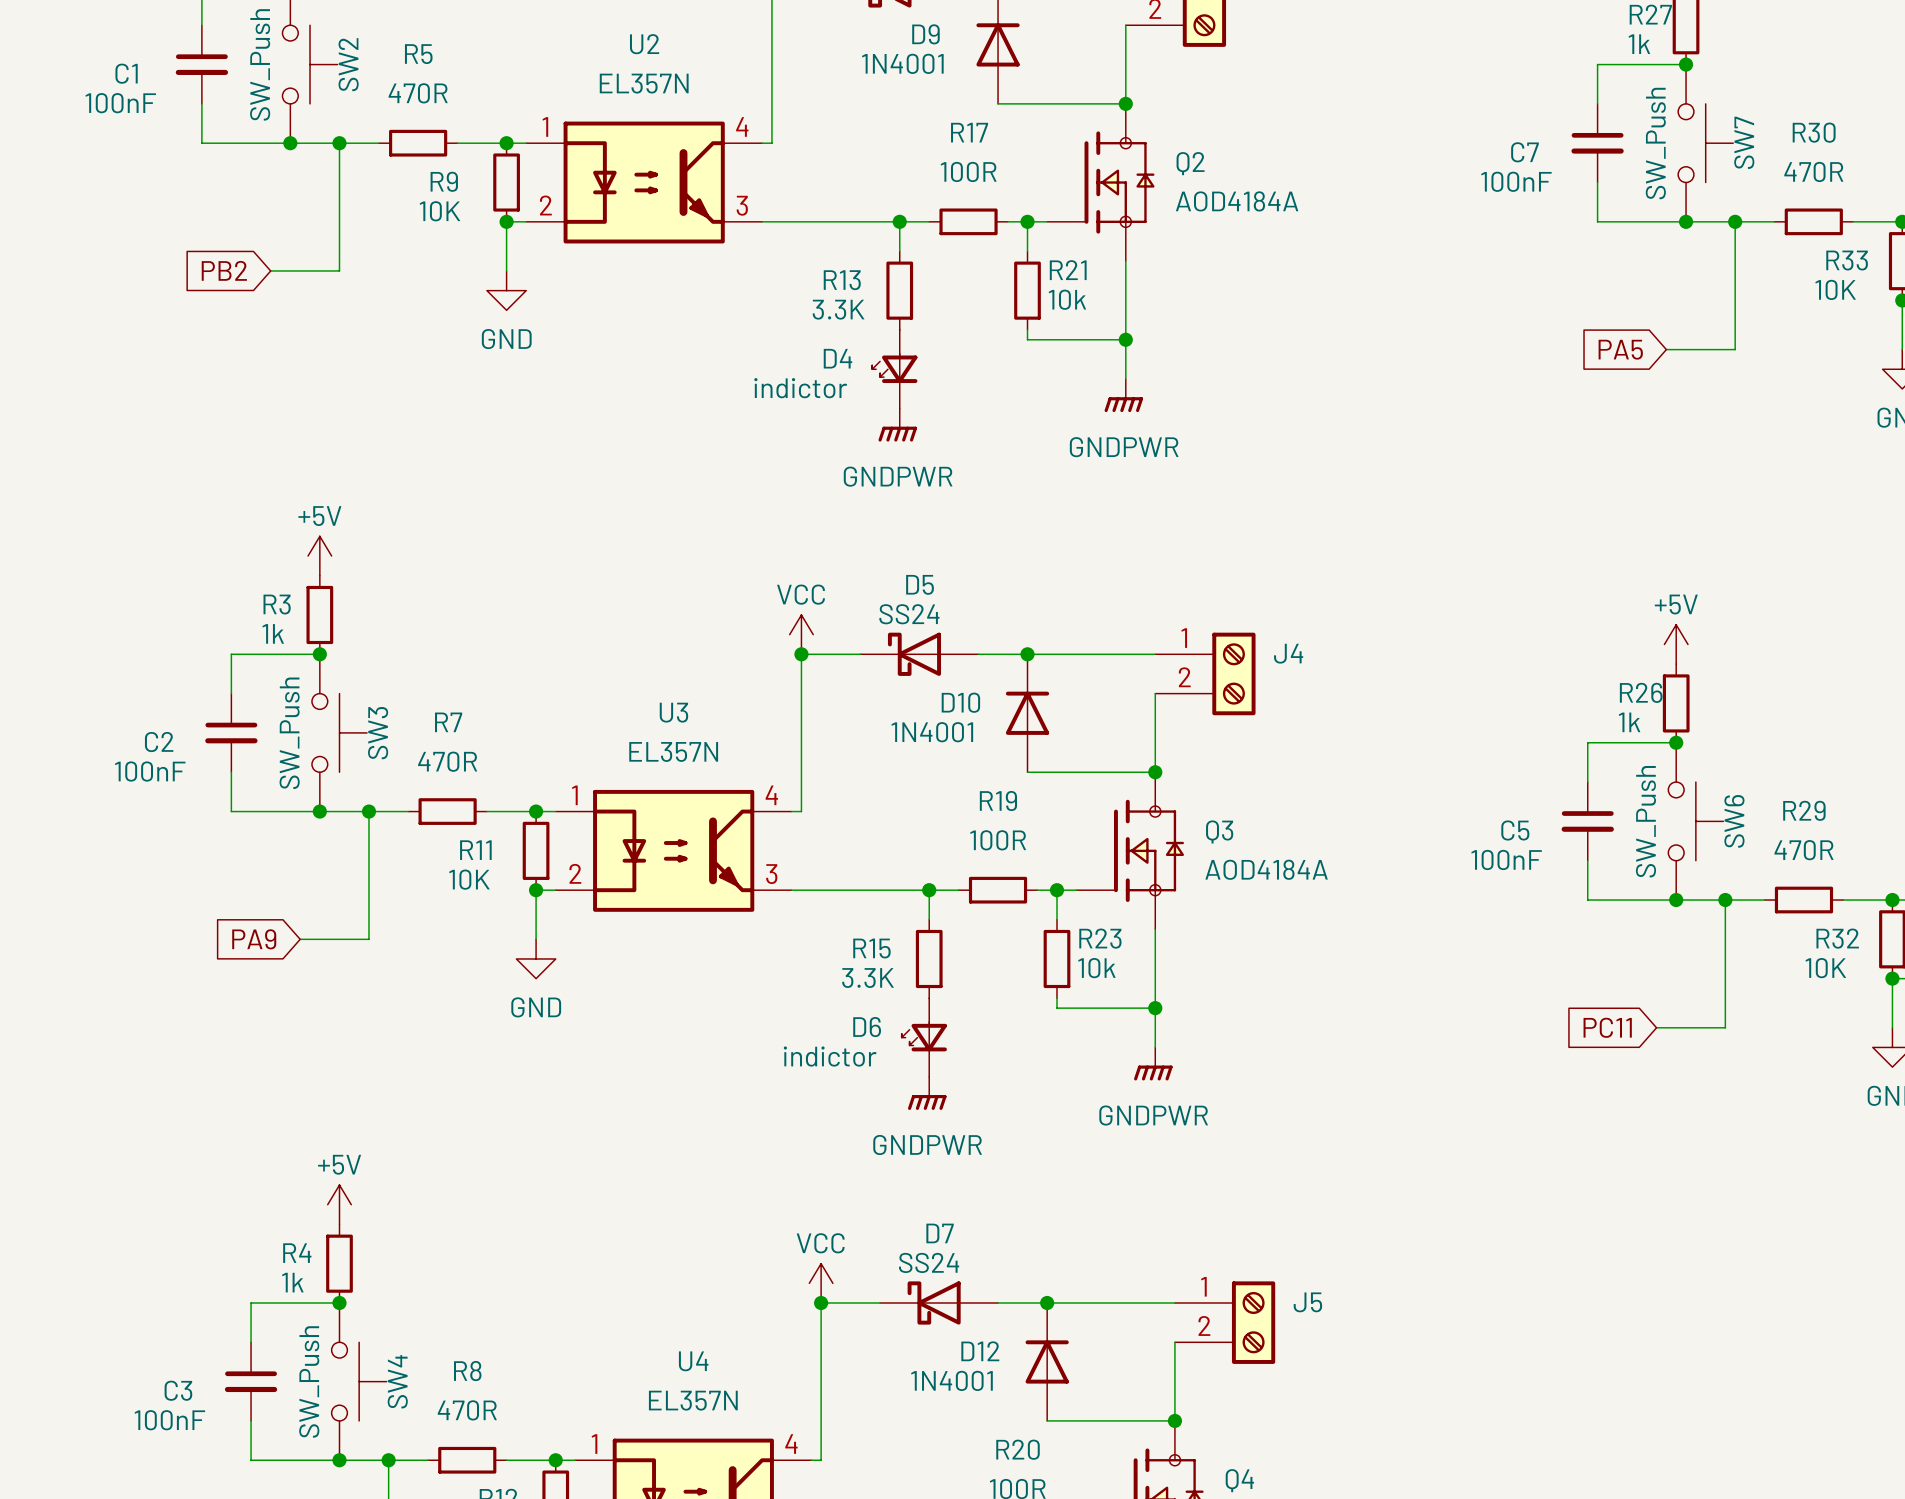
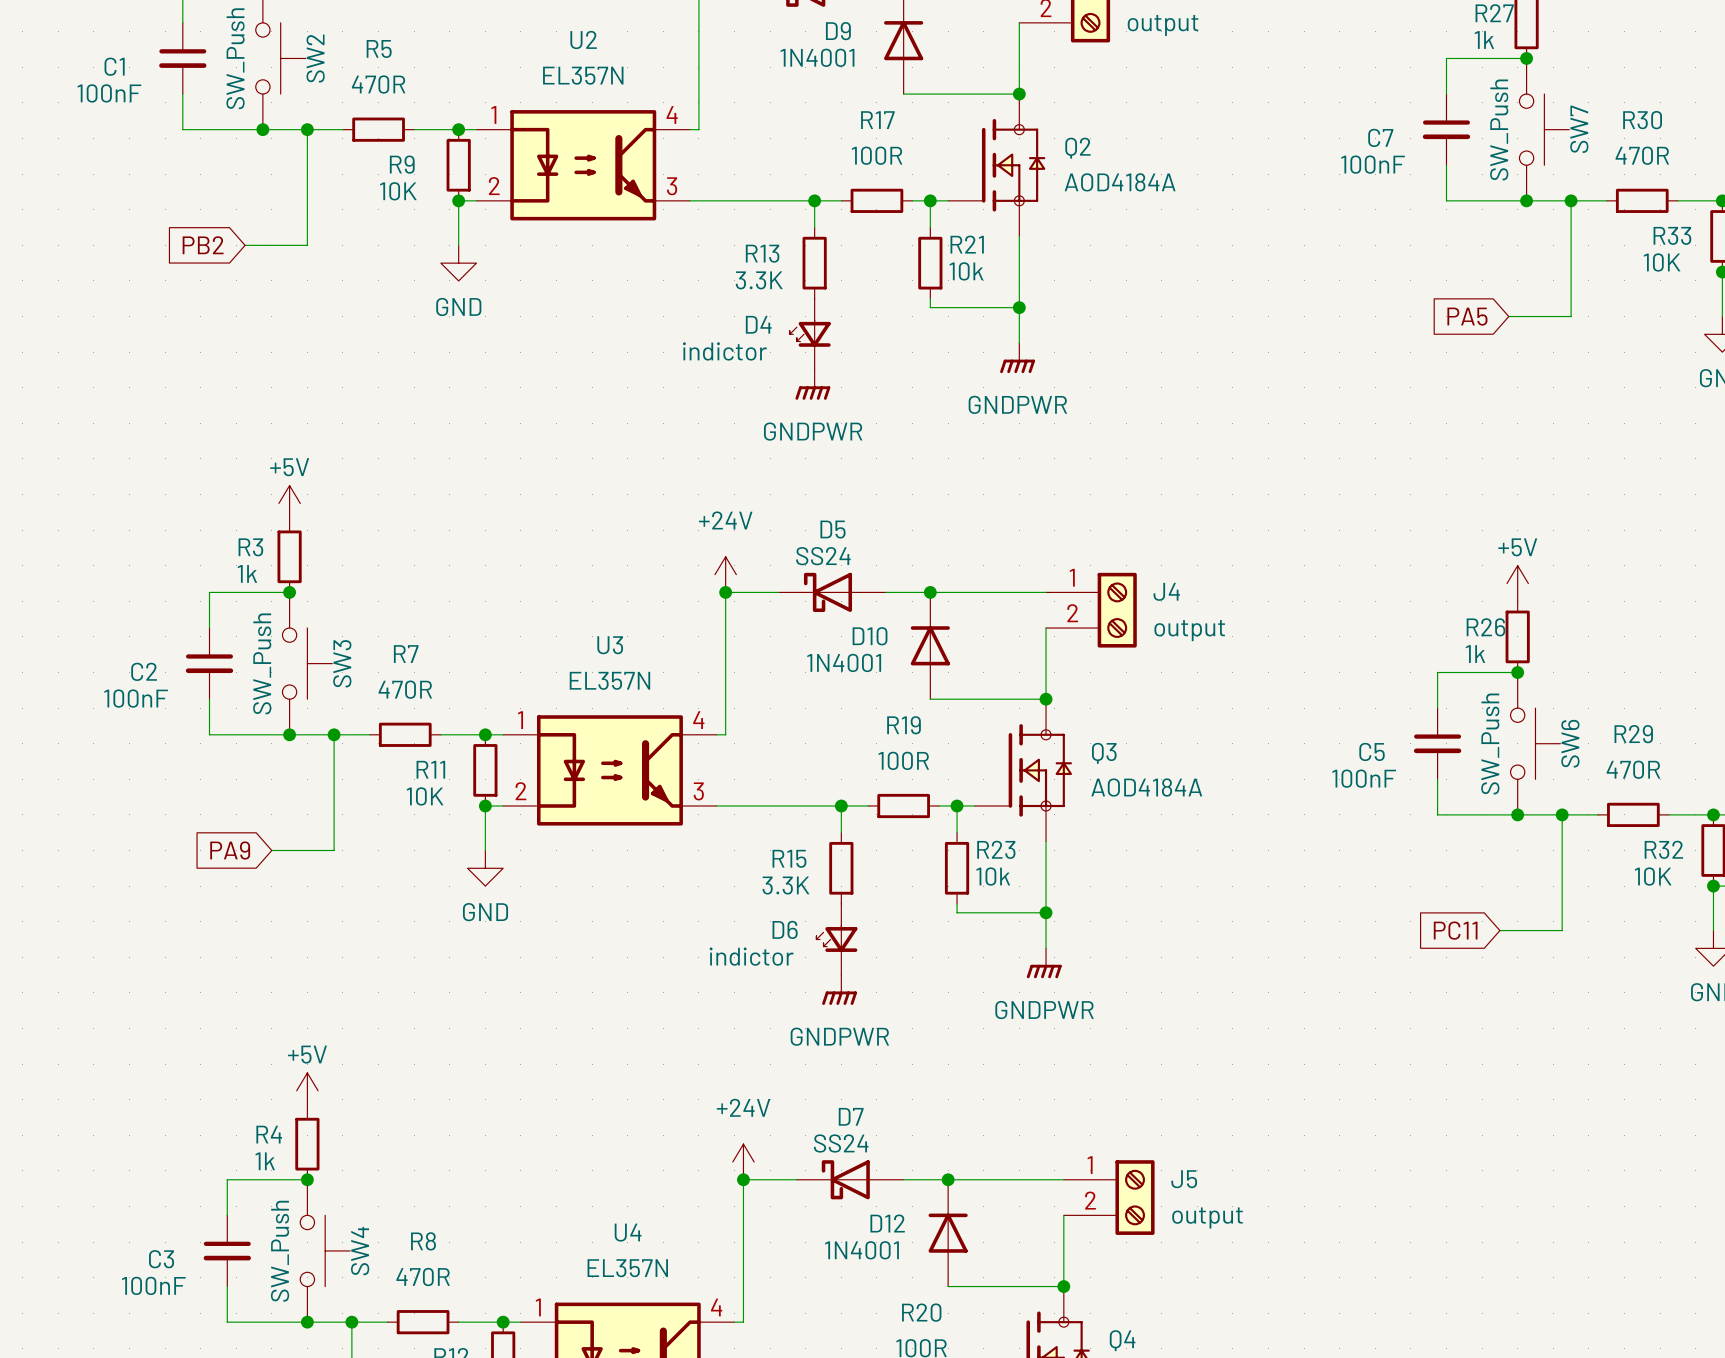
part value: none -> output (1163, 25)
power symbol: VCC (801, 634) -> +24V (725, 574)
J4 value: none -> output (1189, 630)
power symbol: VCC (821, 1283) -> +24V (743, 1161)
J5 value: none -> output (1207, 1217)

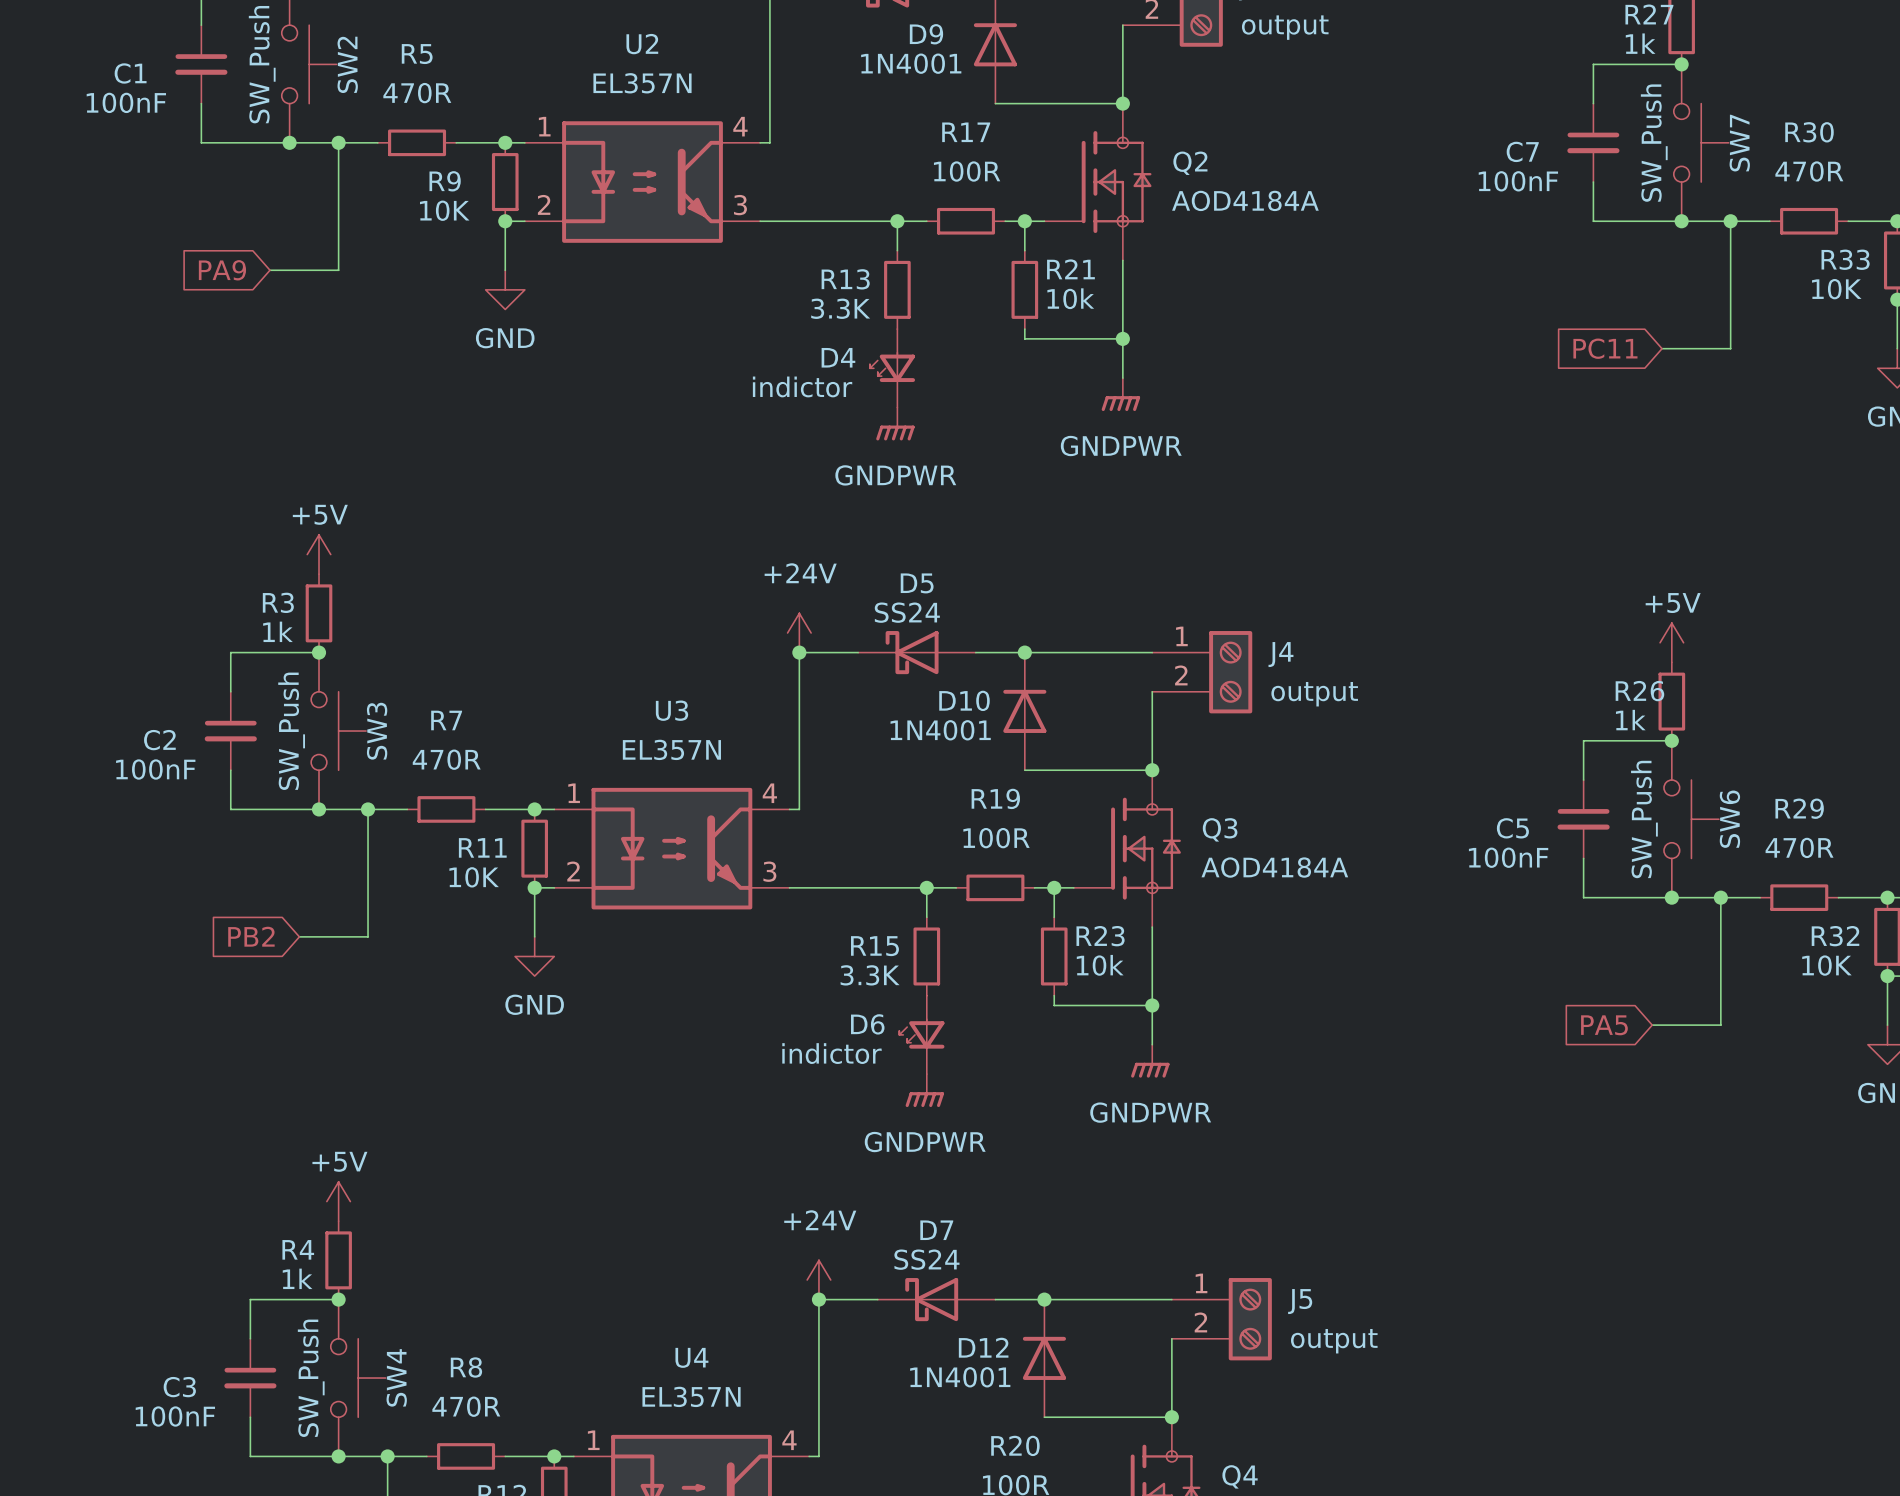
global label: PB2 (203, 245) -> PA9 (222, 270)
global label: PA5 (1467, 316) -> PC11 (1605, 348)
global label: PA9 (230, 850) -> PB2 (251, 936)
global label: PC11 (1455, 930) -> PA5 (1604, 1025)

